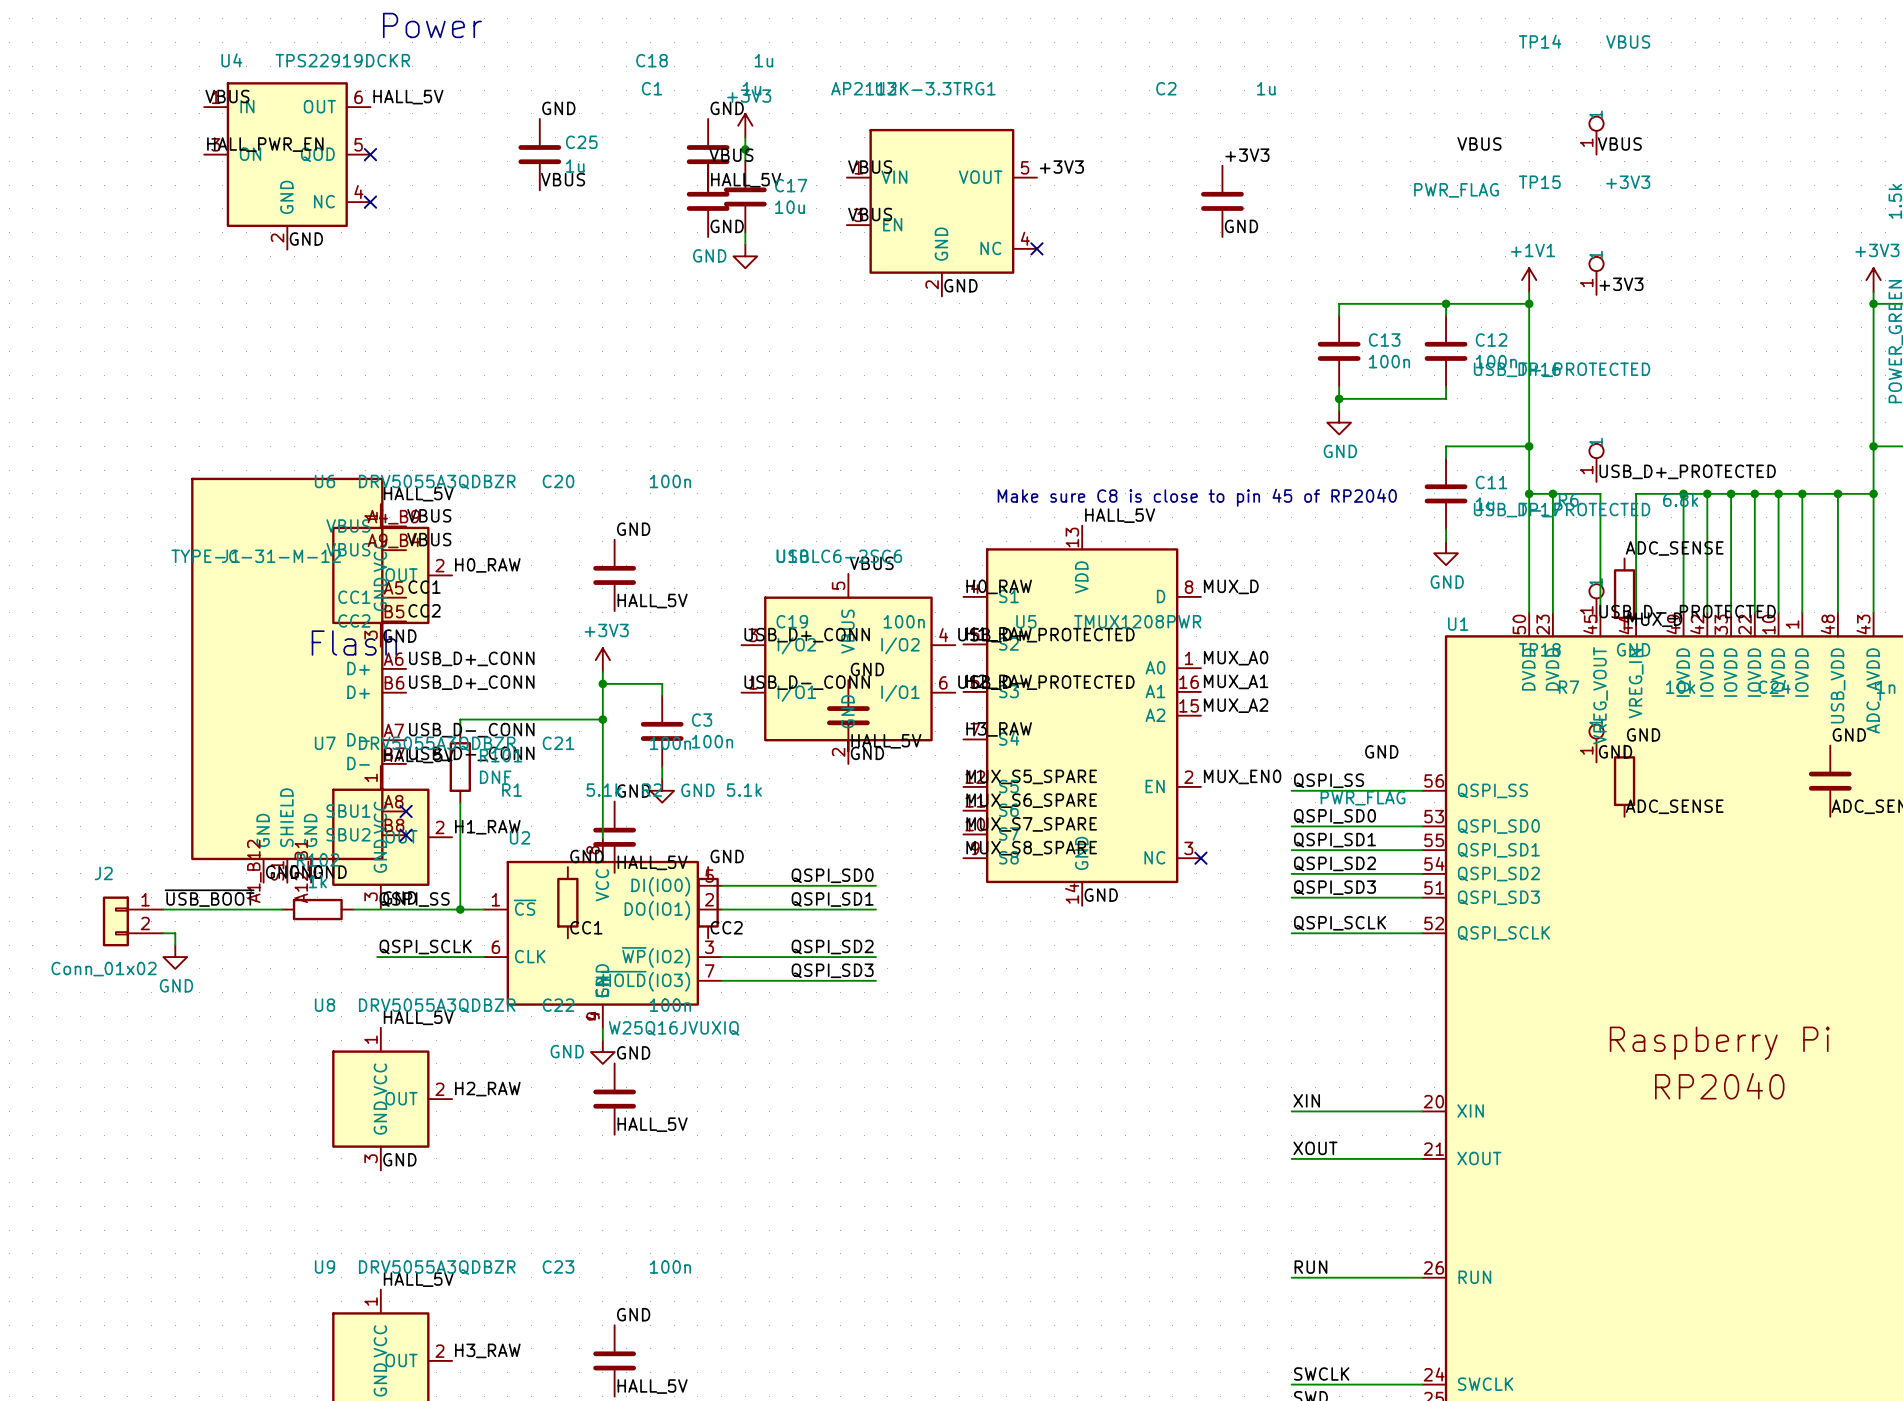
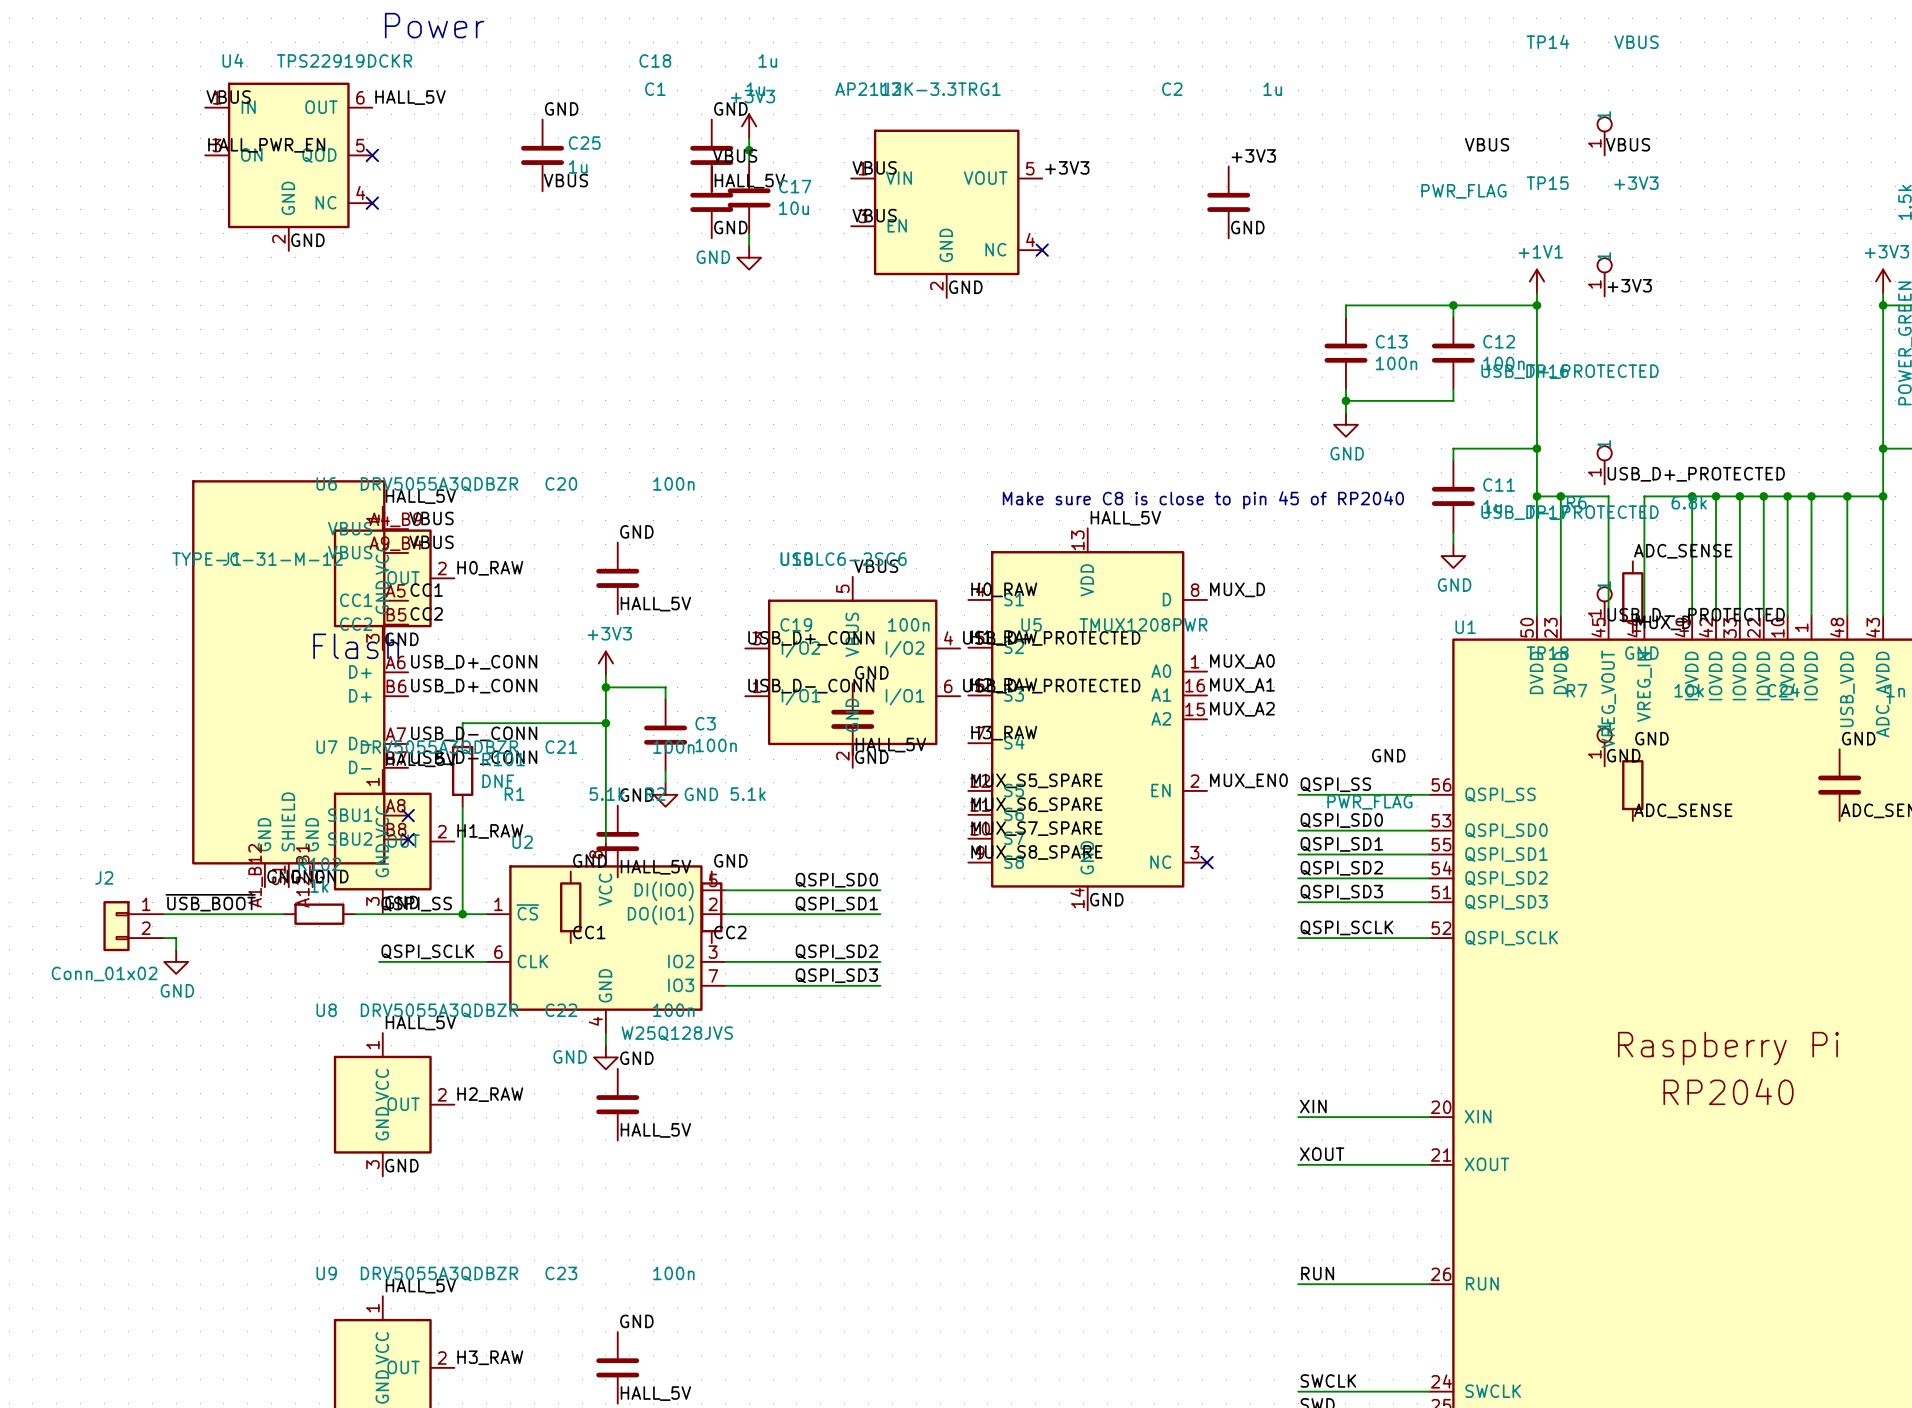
U2 symbol: [484, 838, 722, 1029] -> [486, 842, 726, 1034]
U2 value: W25Q16JVUXIQ (674, 1028) -> W25Q128JVS (677, 1033)

